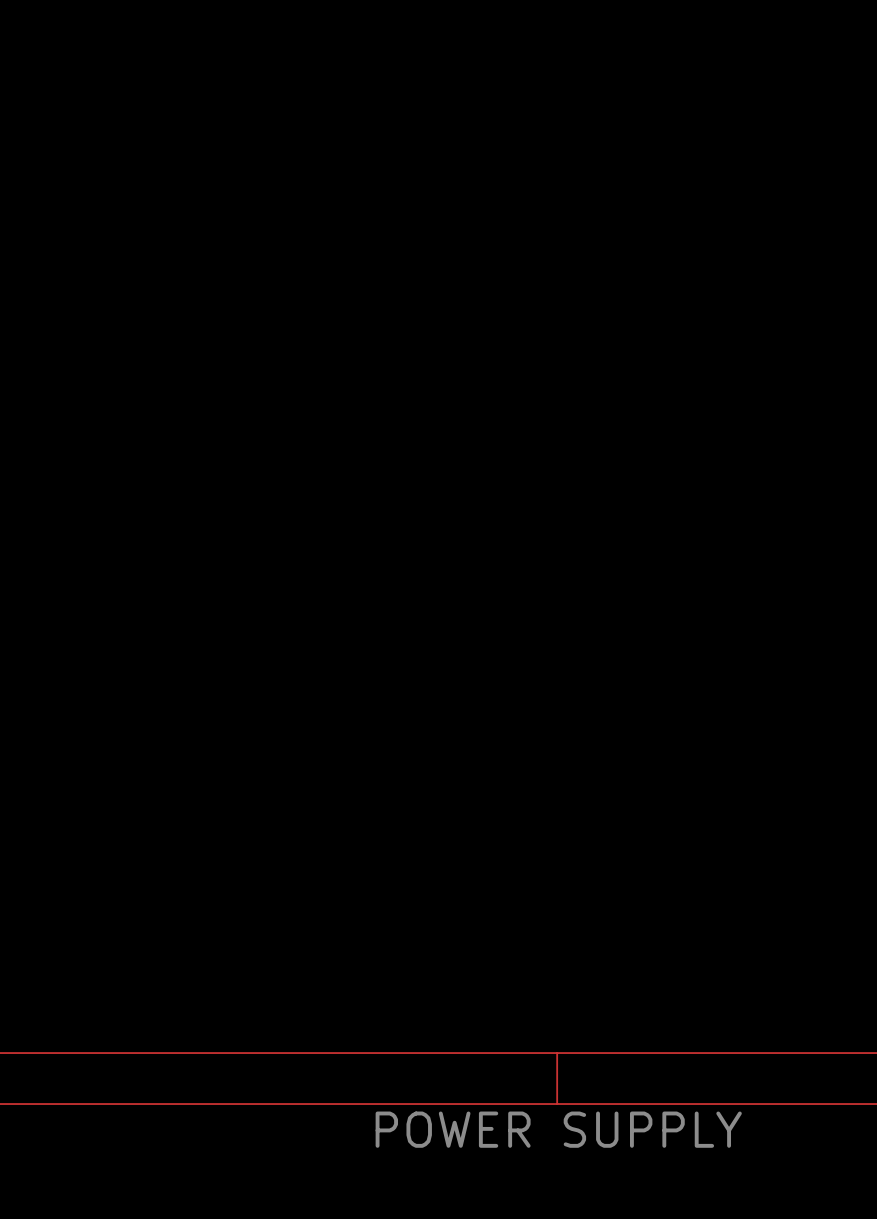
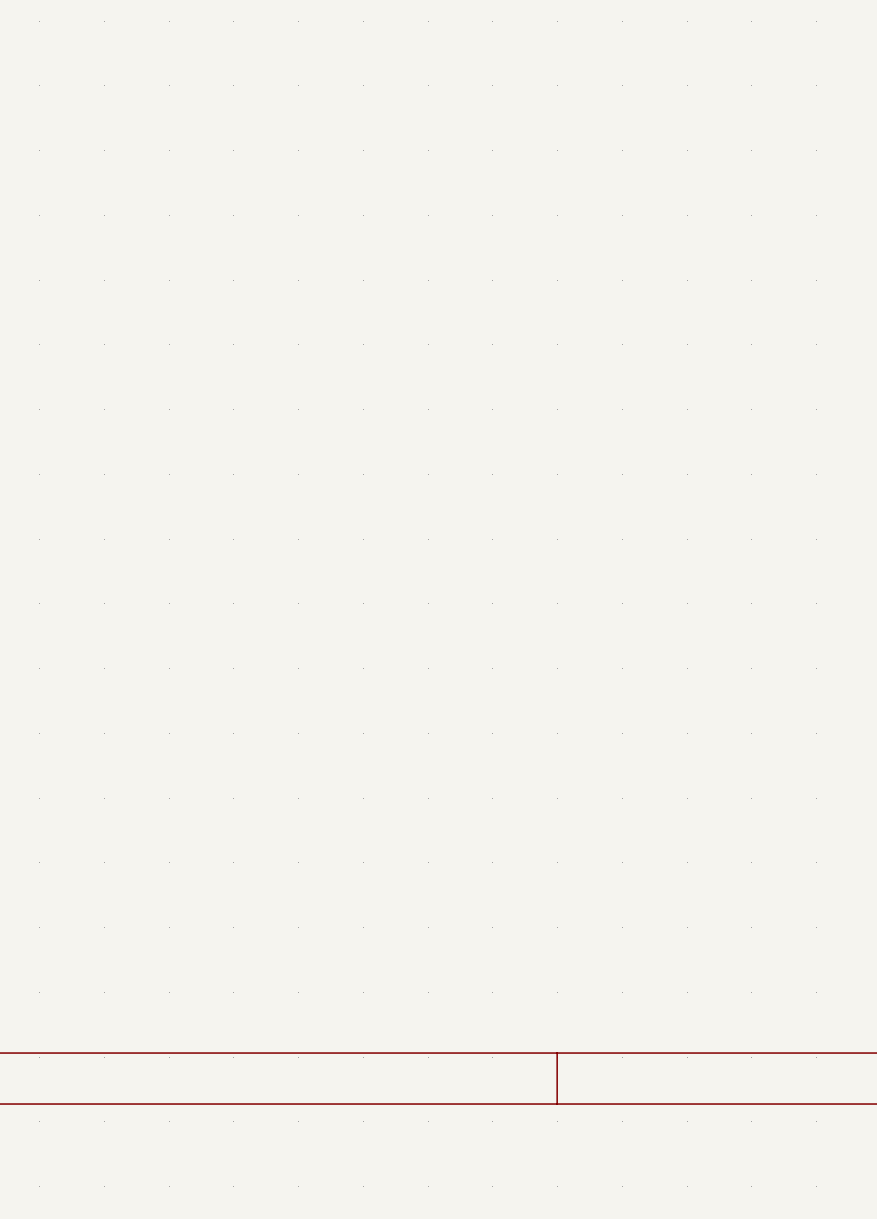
text: POWER SUPPLY (558, 1129) -> none

